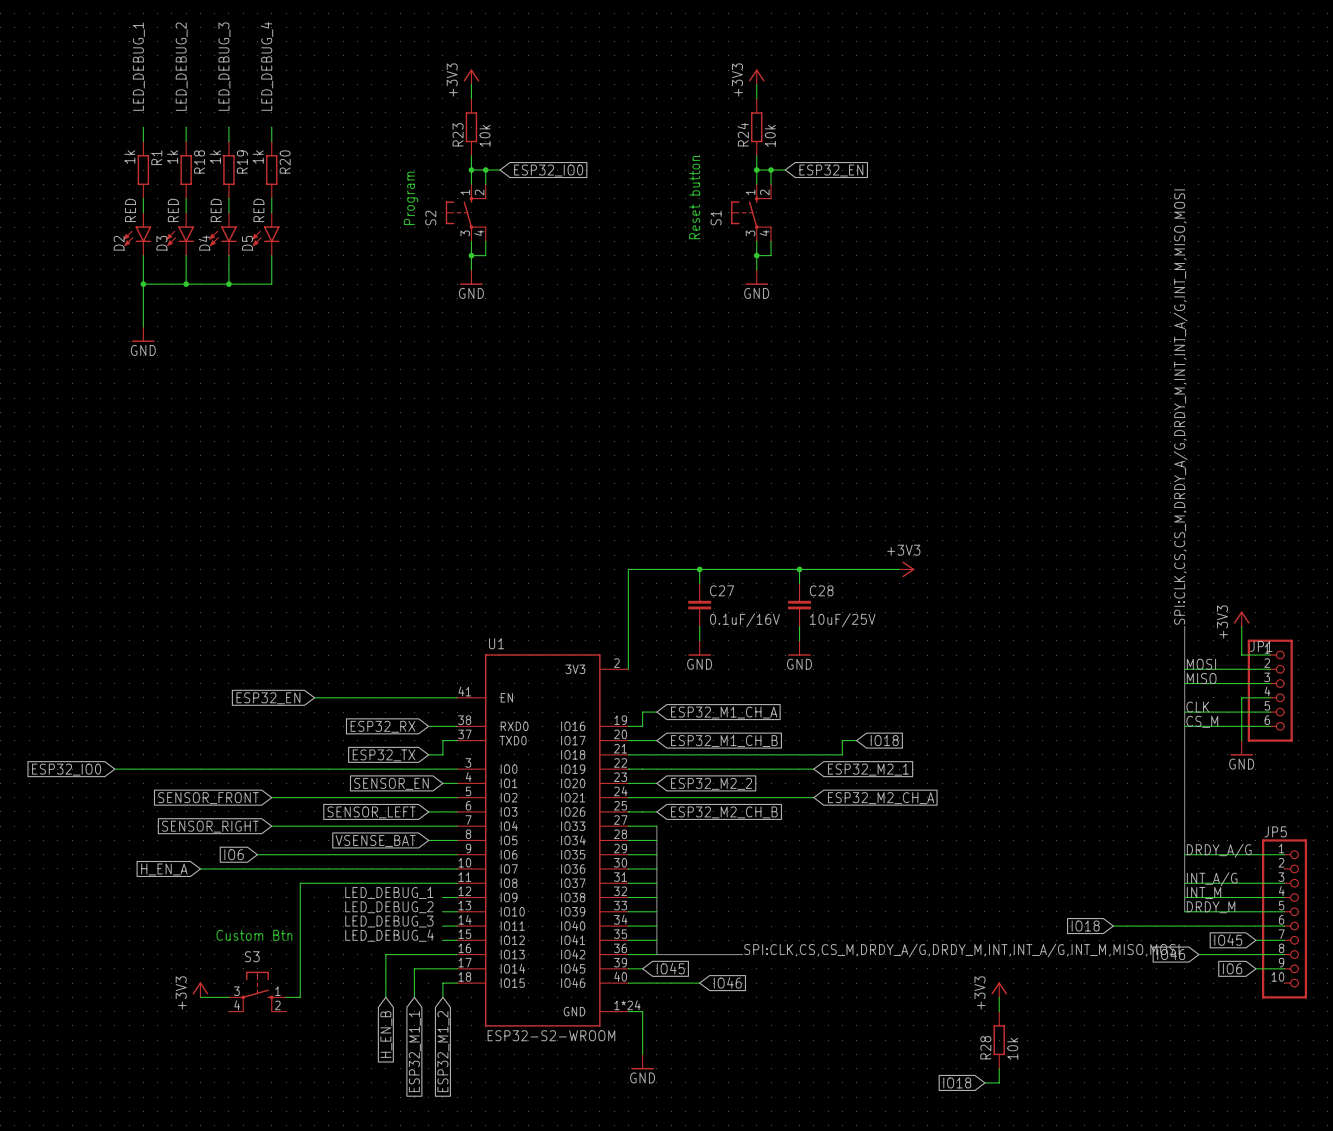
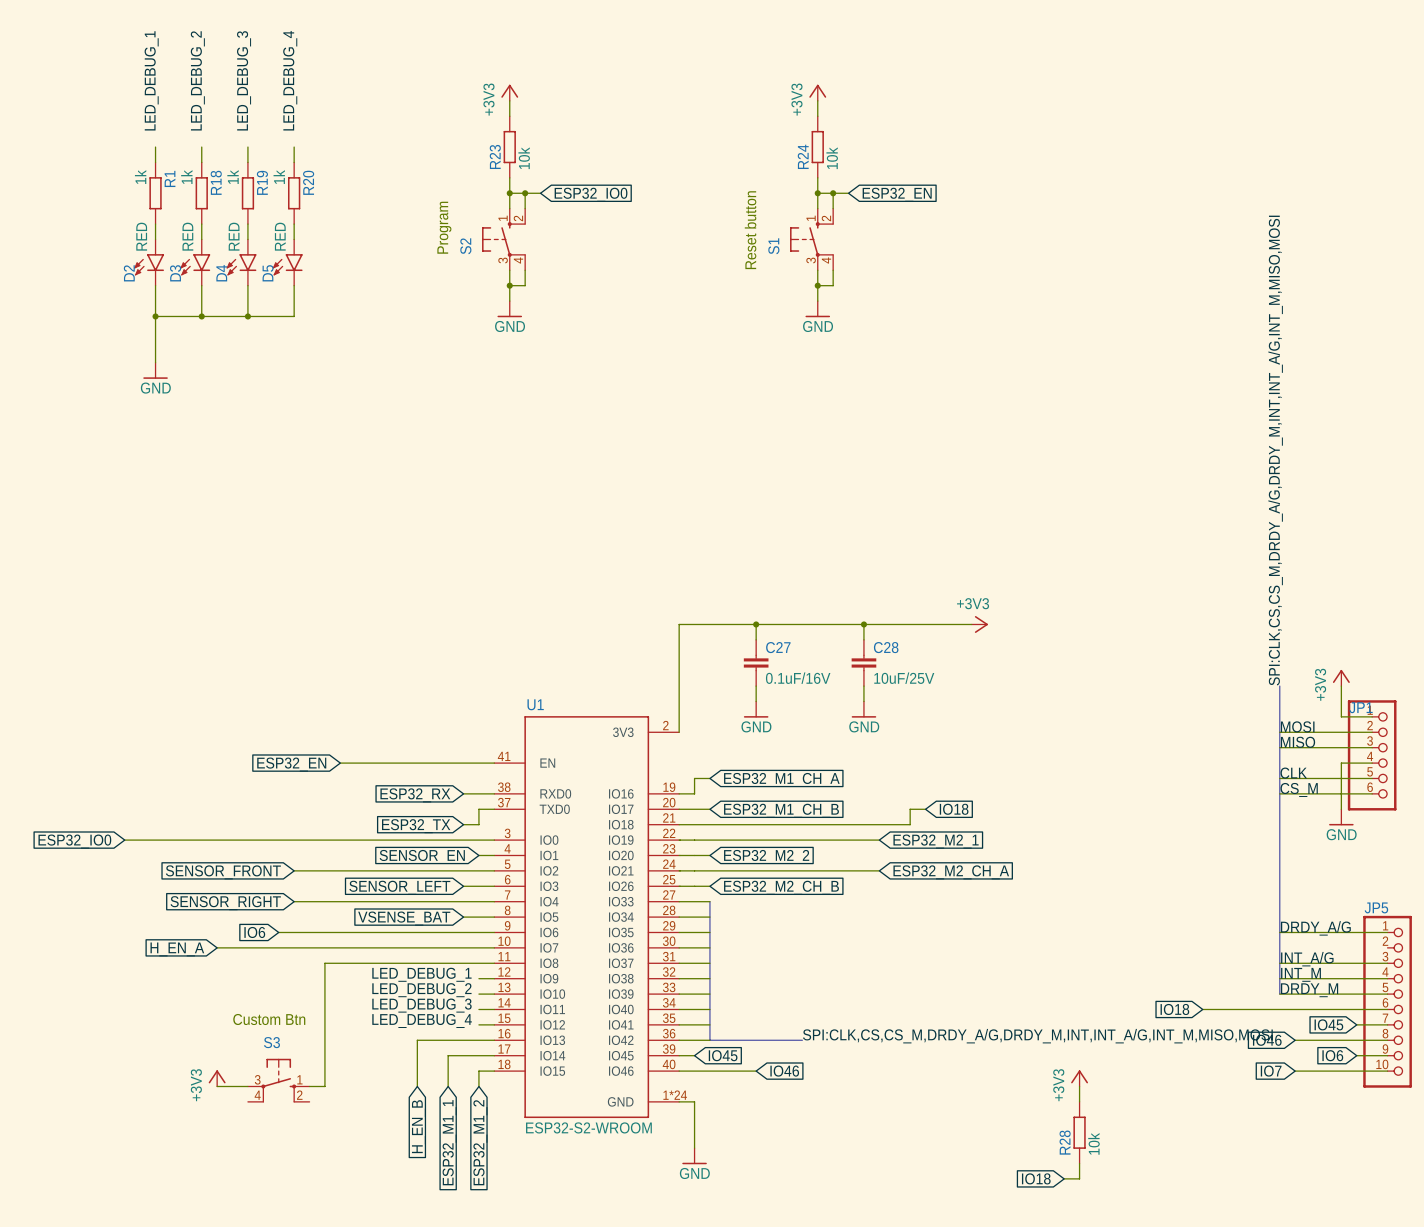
global label: none -> IO7 (1271, 1071)
wire: none -> (1295, 1071) (1387, 1071)

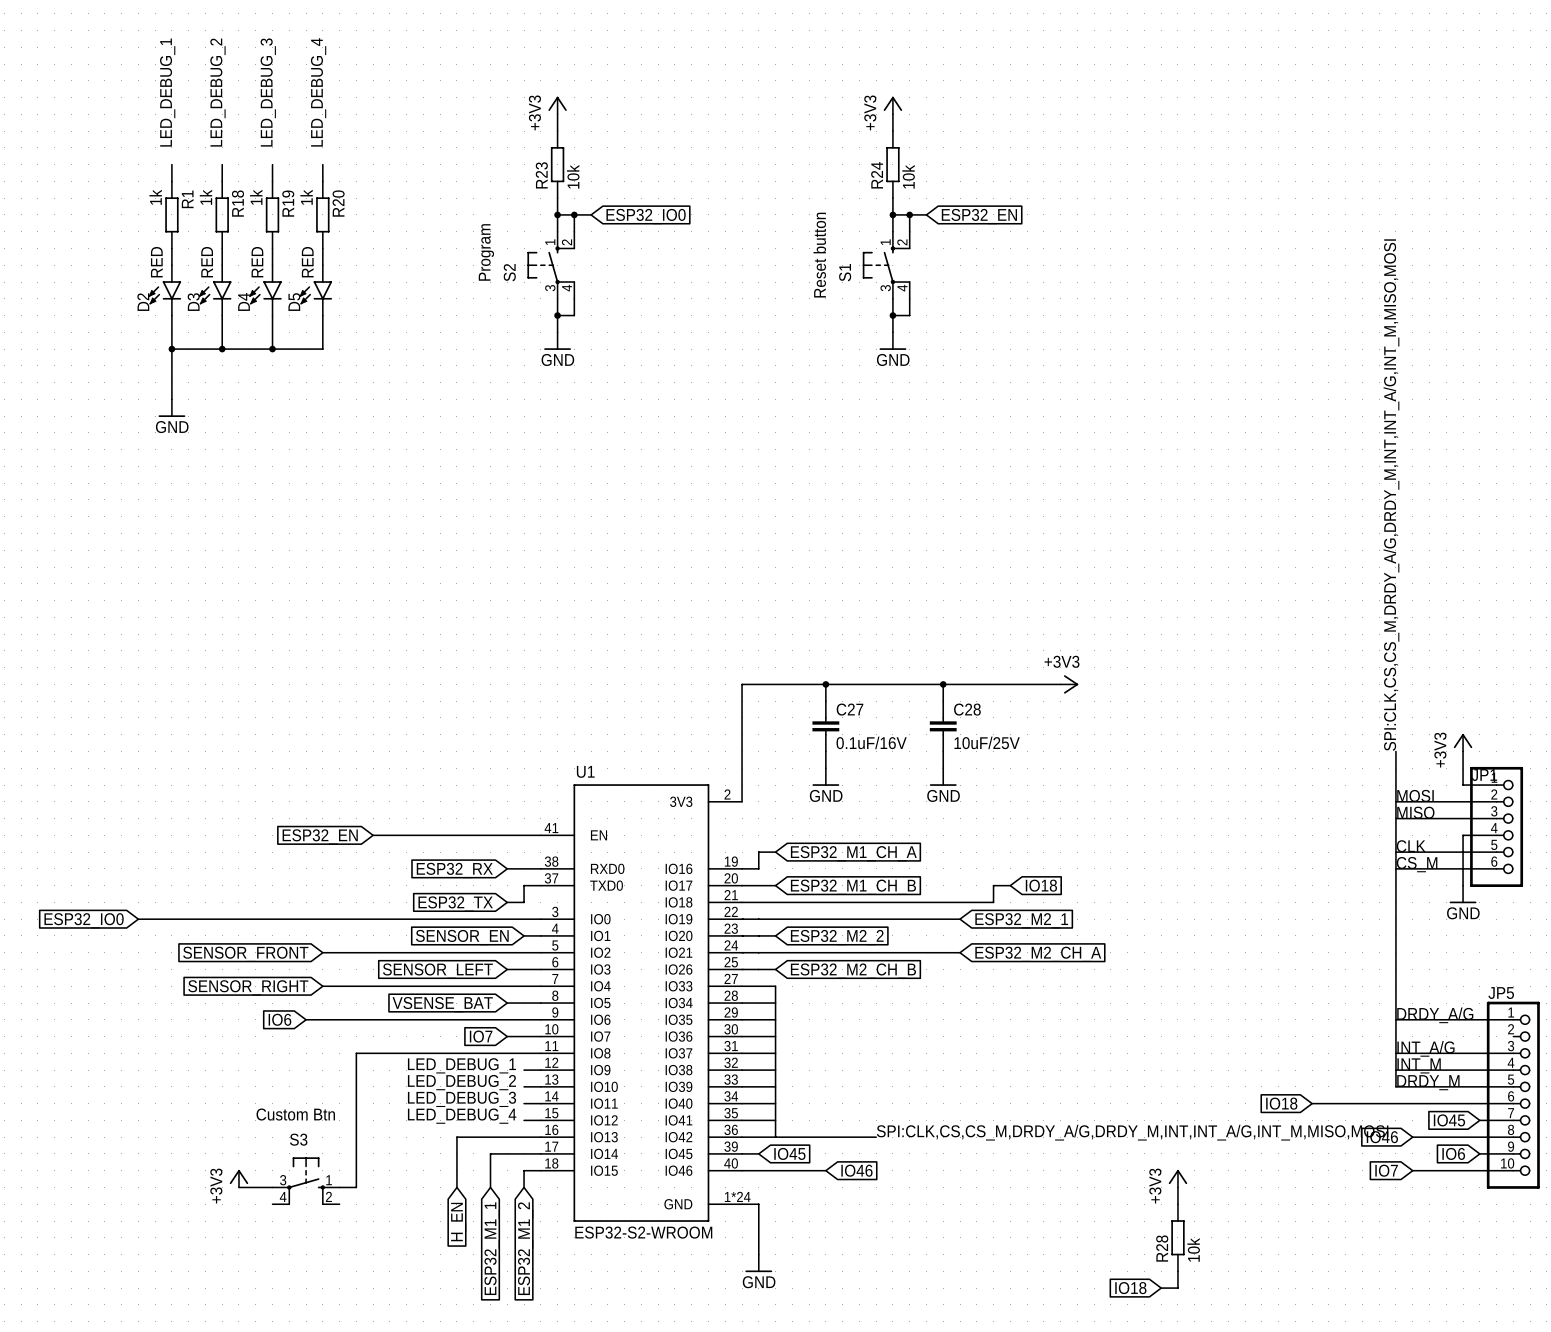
wire: (217, 947) (463, 947) -> none
global label: none -> IO7 (481, 1036)
global label: H_EN_A (177, 949) -> none
global label: H_EN_B (418, 1126) -> H_EN (458, 1222)

